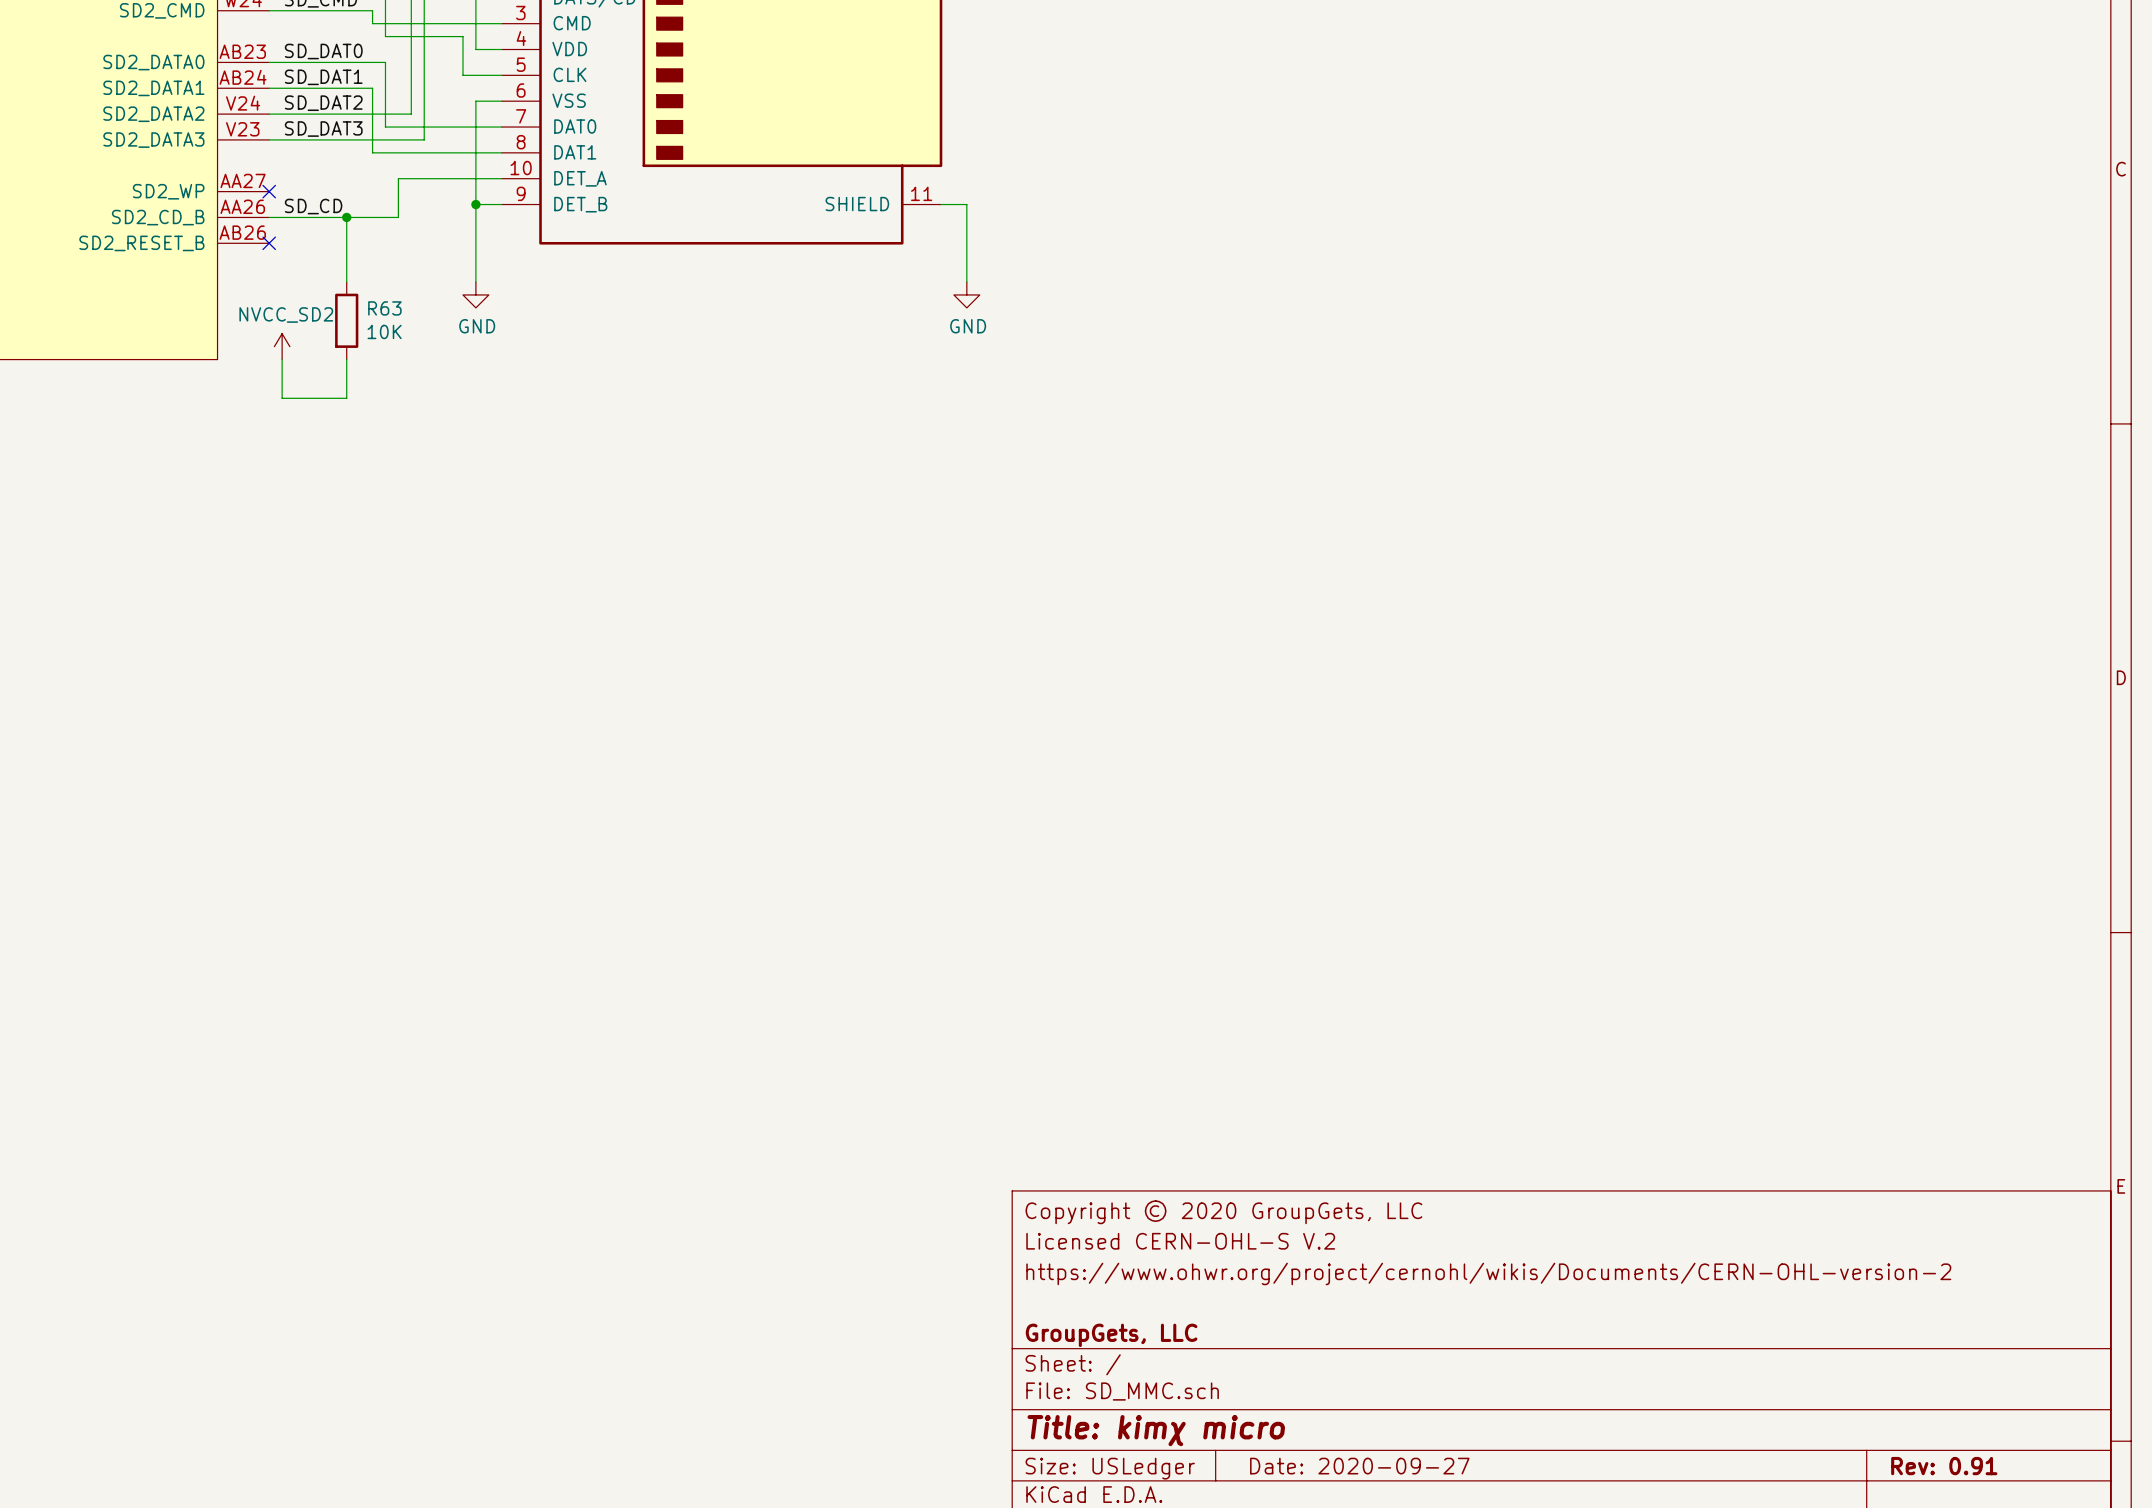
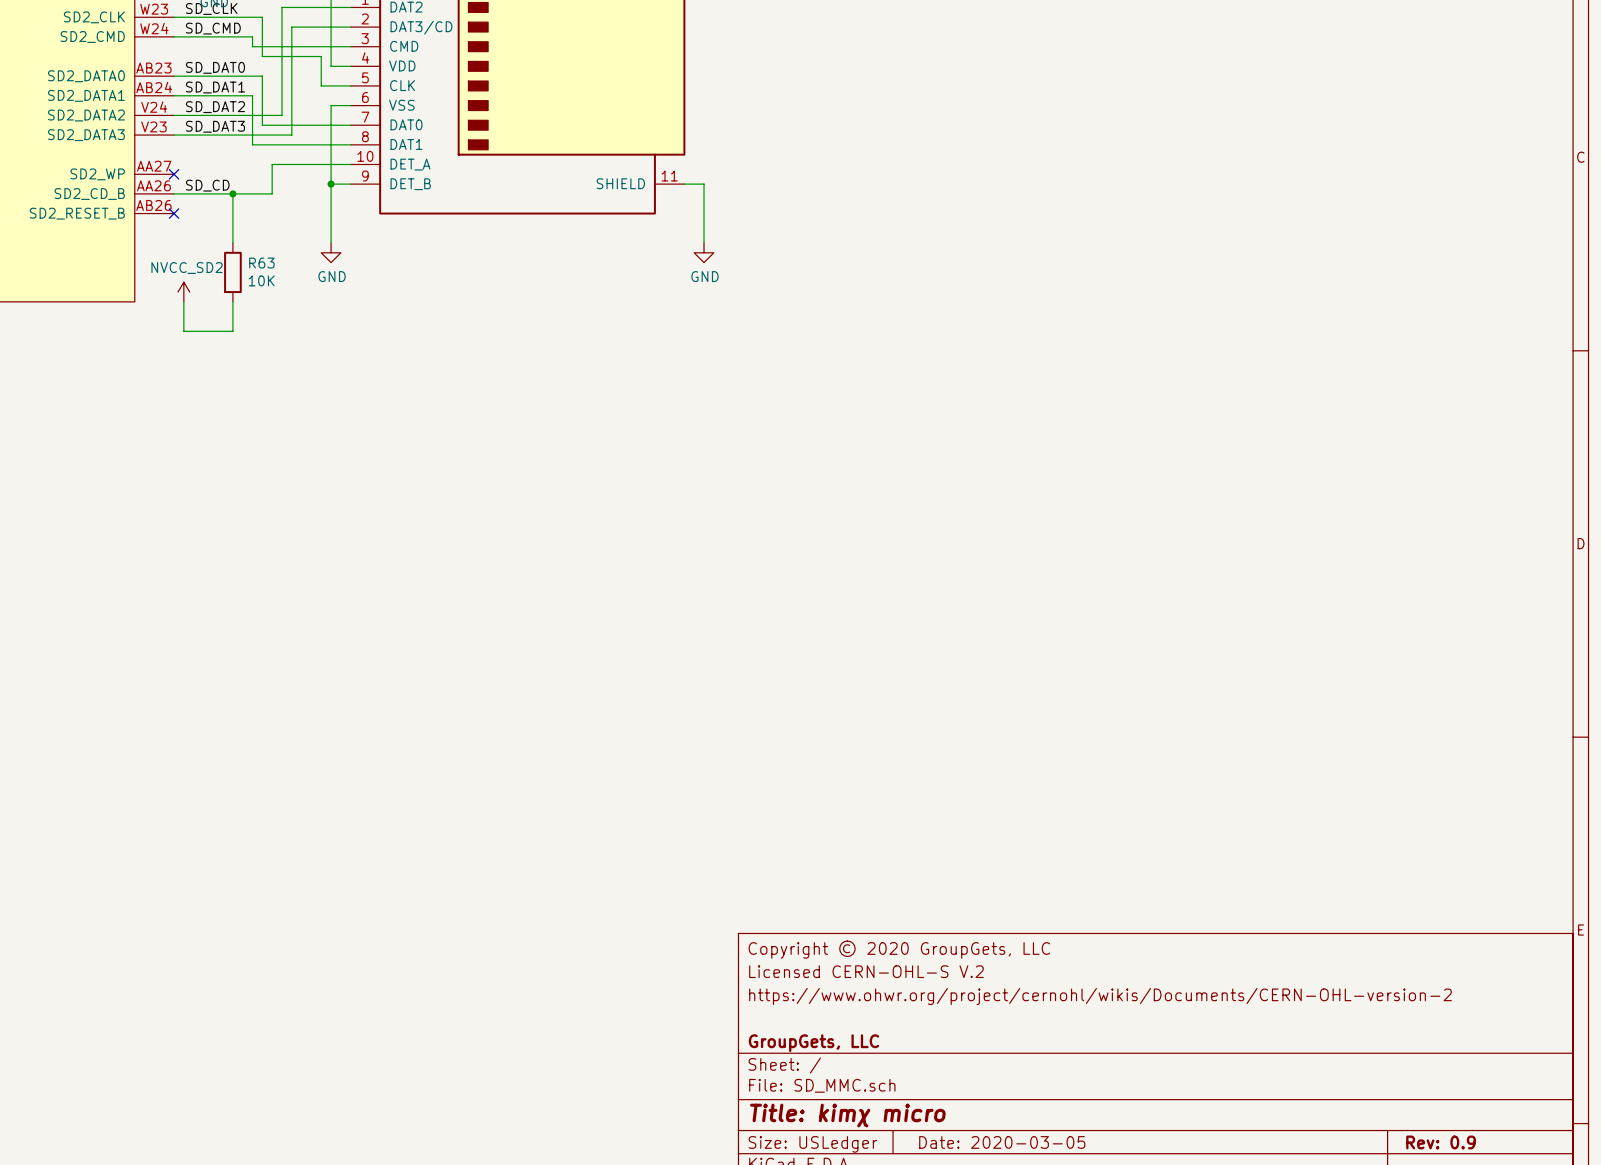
title block: Date: 2020-09-27 (1359, 1466) -> Date: 2020-03-05 (1002, 1142)
title block: Rev: 0.91 (1944, 1466) -> Rev: 0.9 (1441, 1142)

